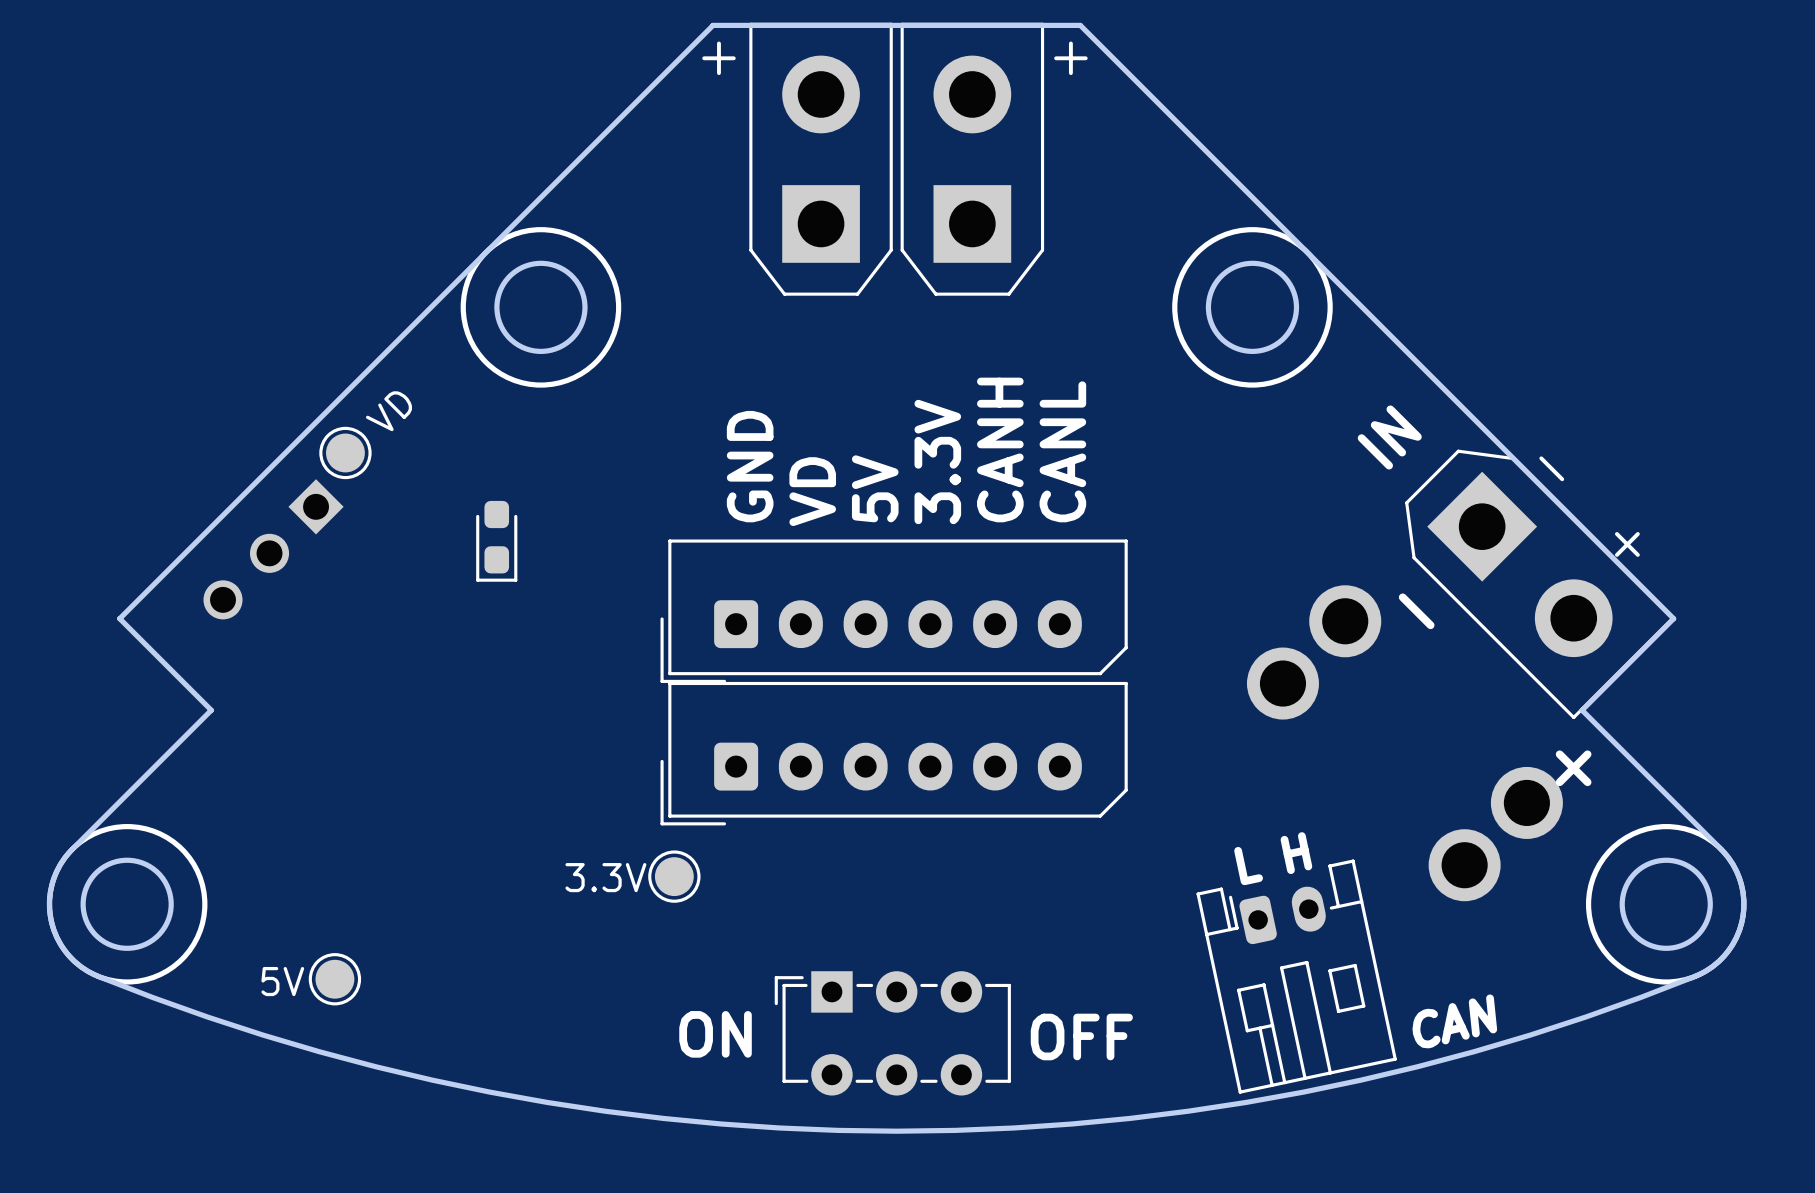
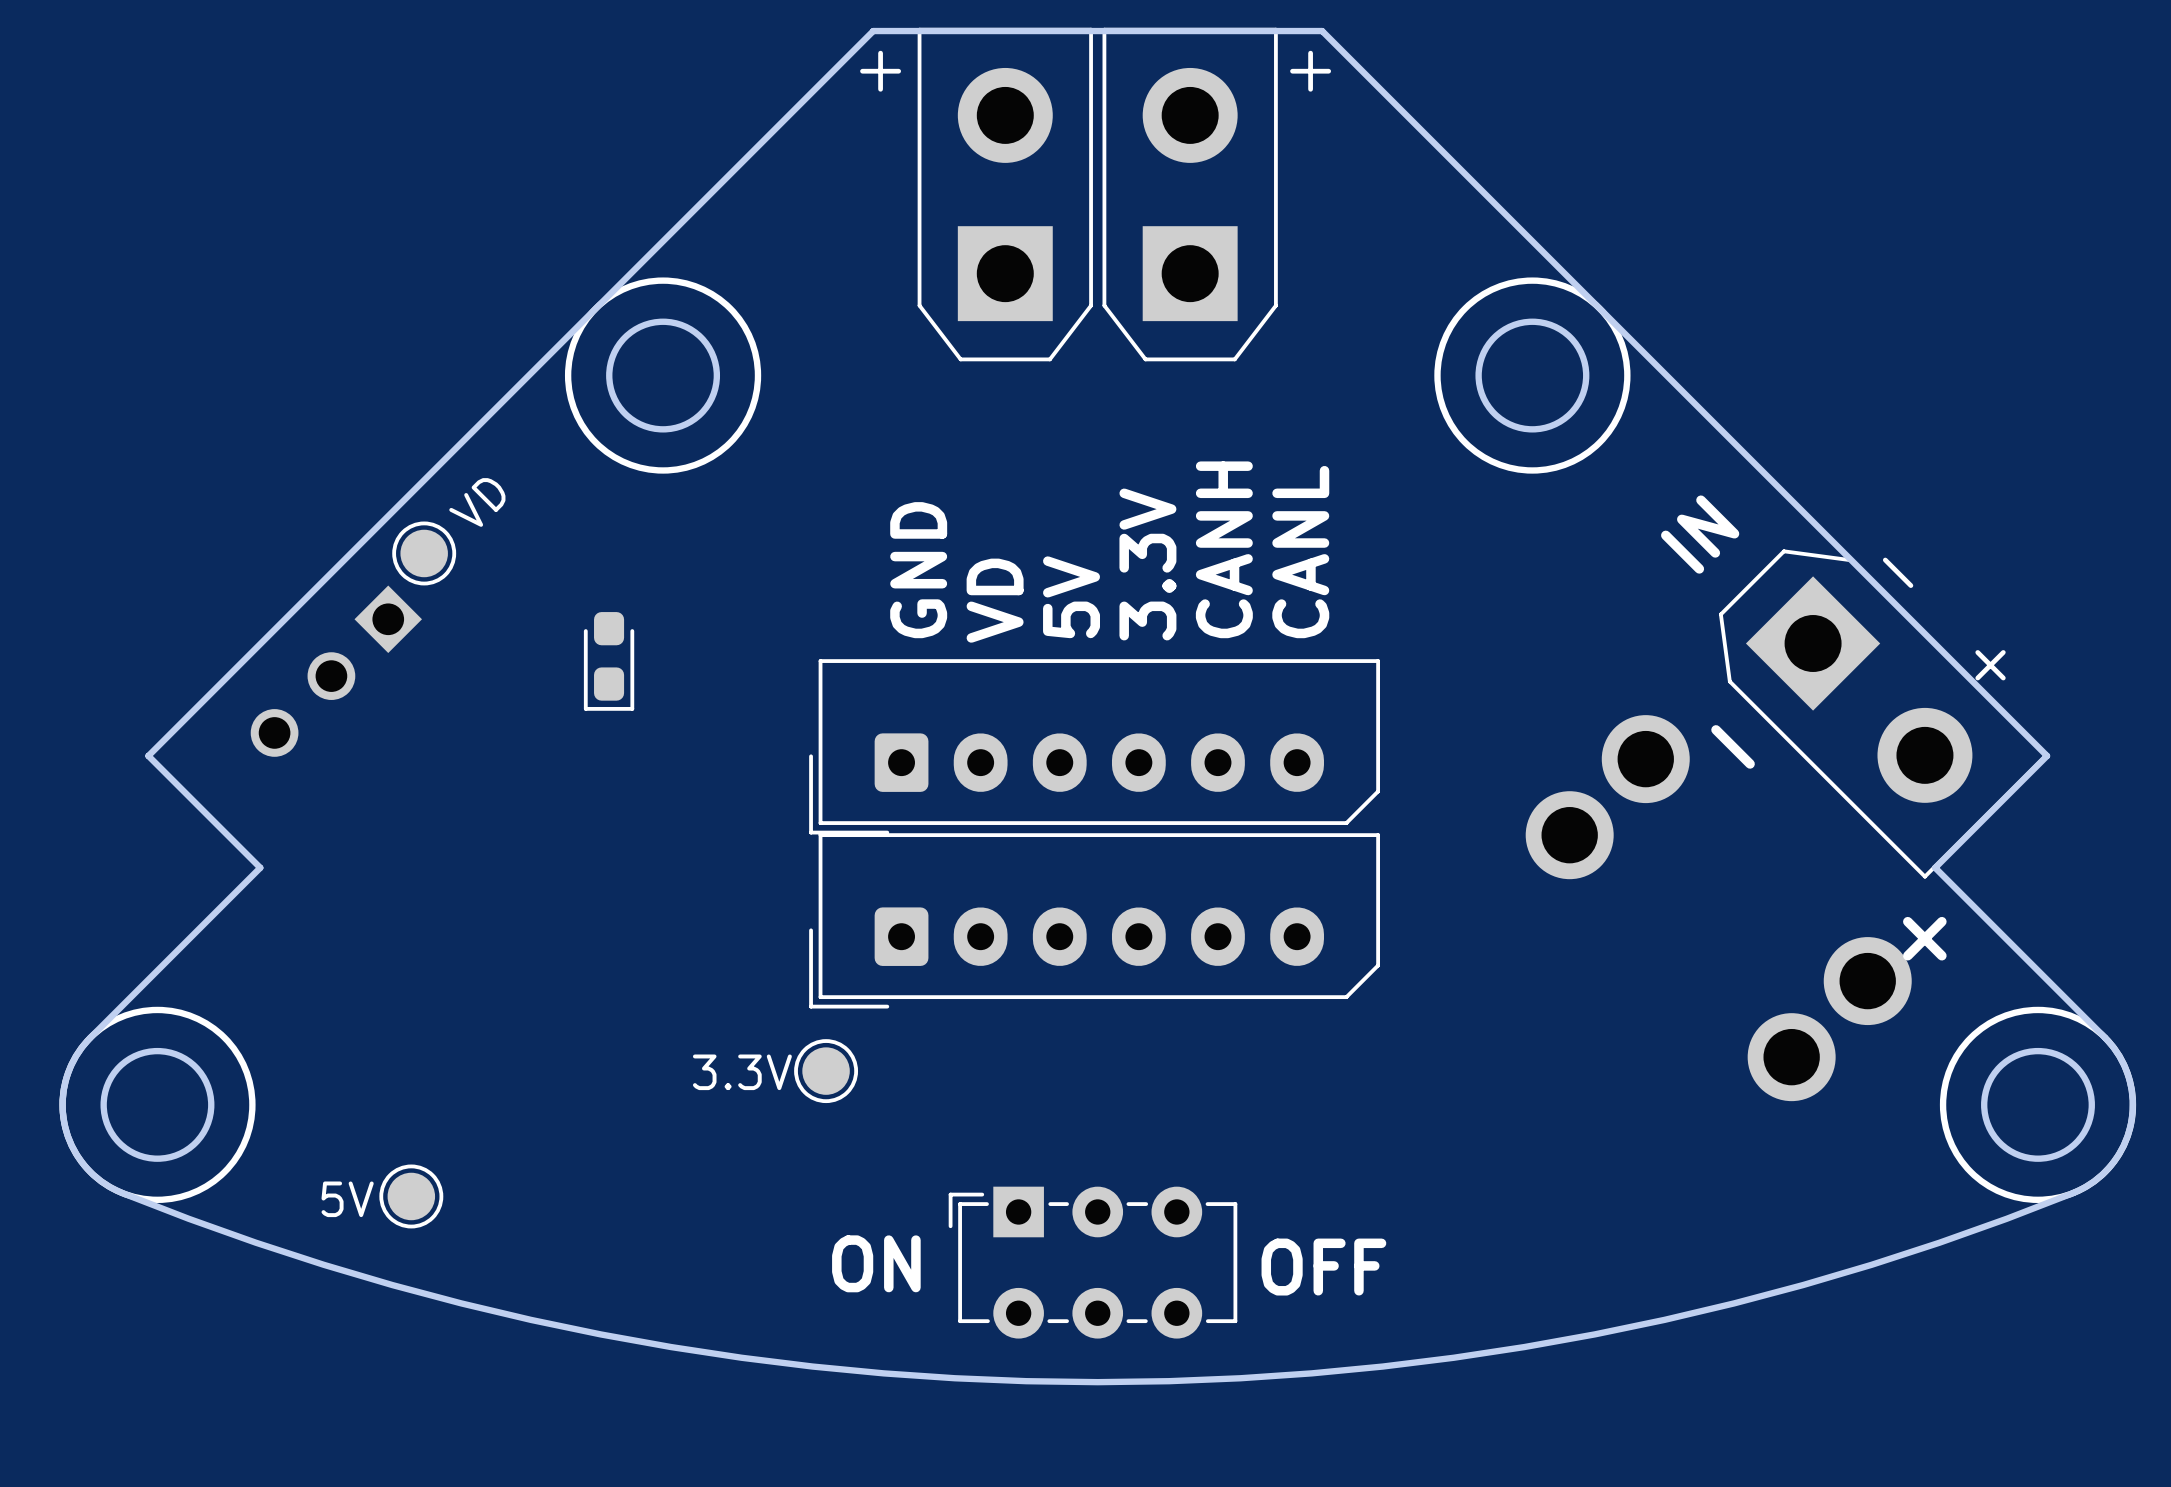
text: H (1296, 853) -> none
text: L (1248, 866) -> none
part: (1296, 976) -> none
text: CAN (1454, 1021) -> none

